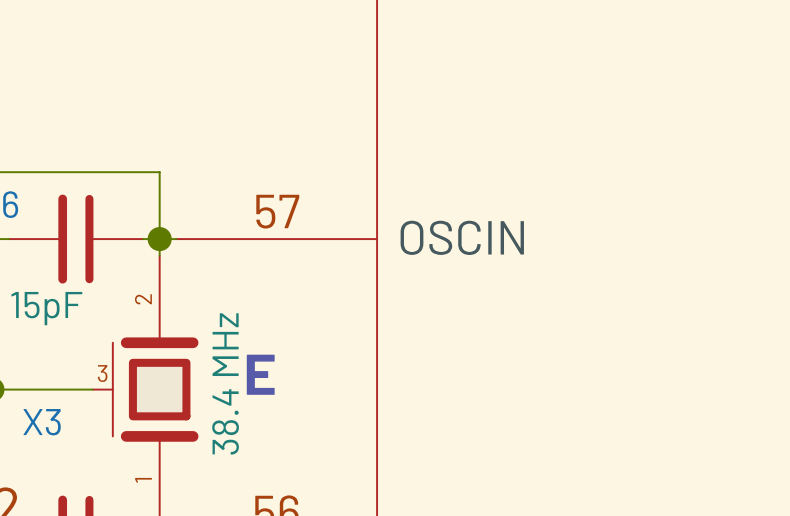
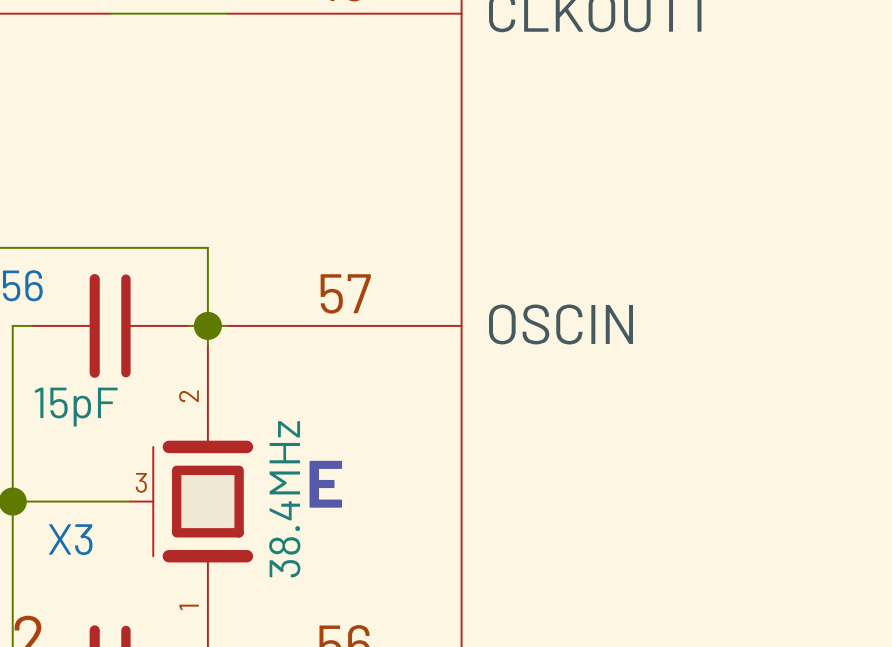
X3 value: 38.4 MHz (225, 383) -> 38.4MHz (284, 499)

